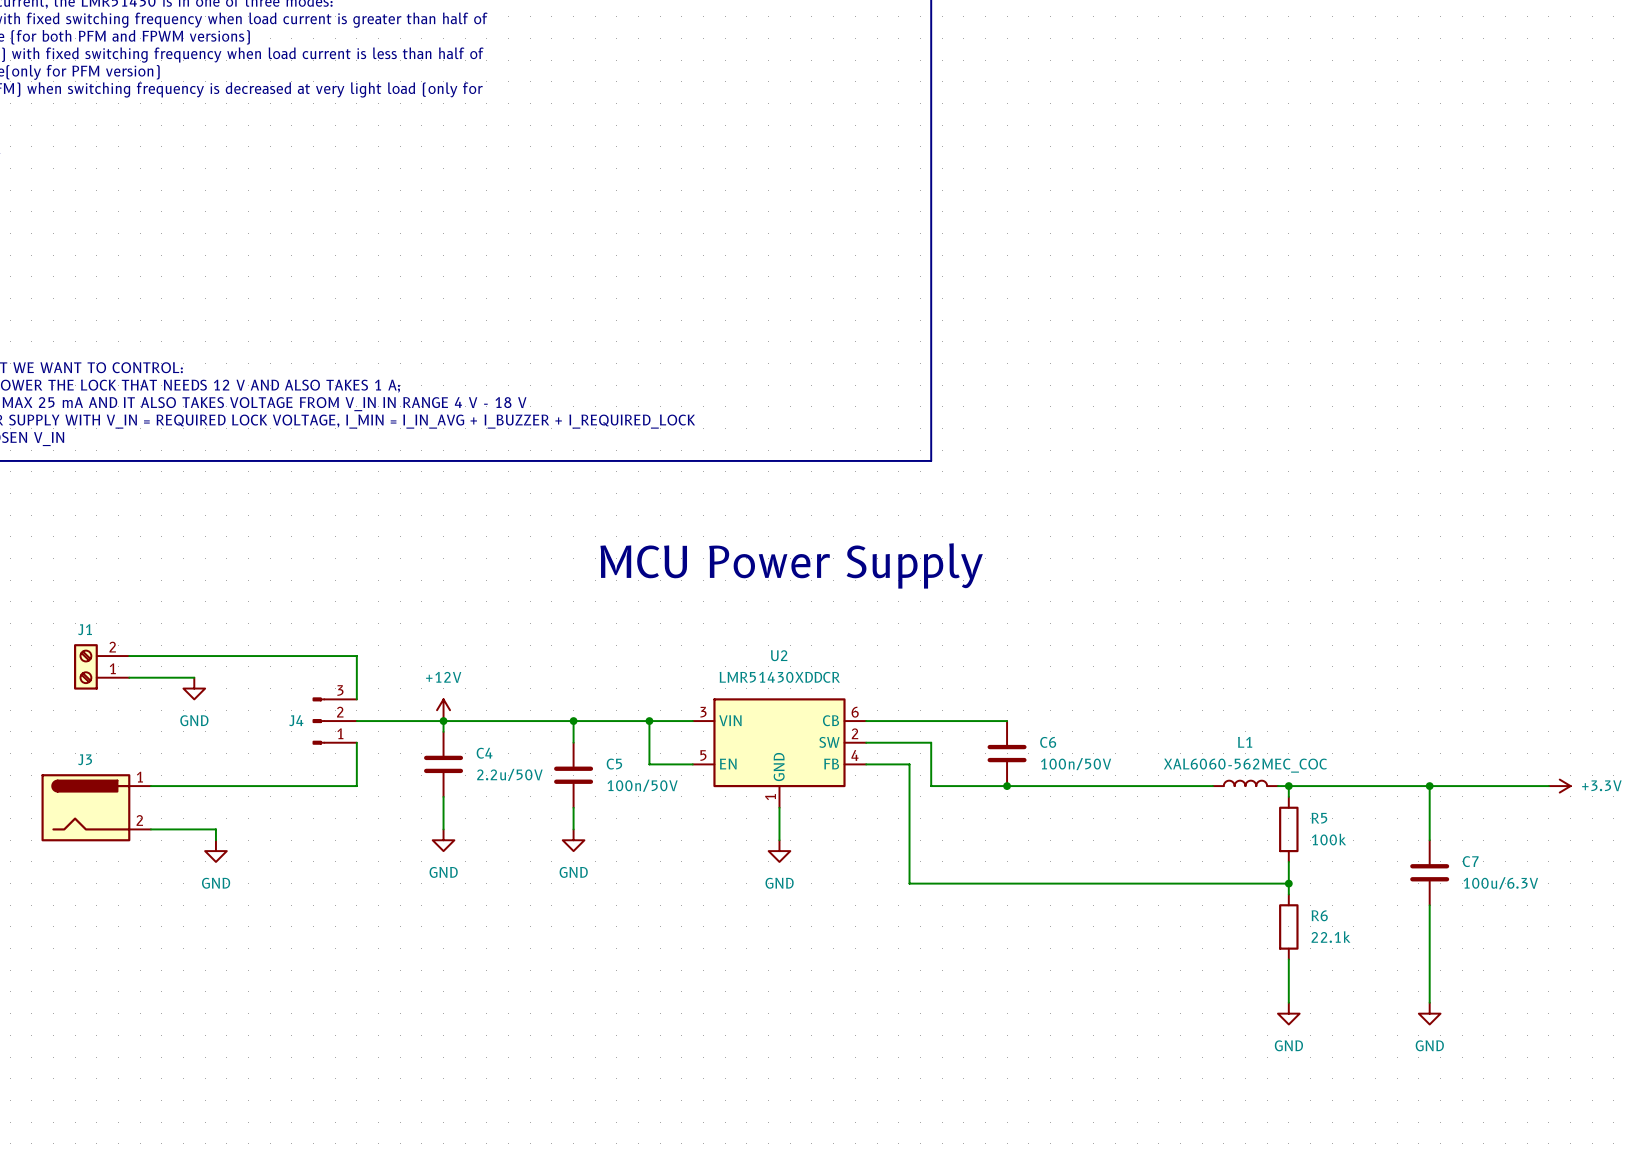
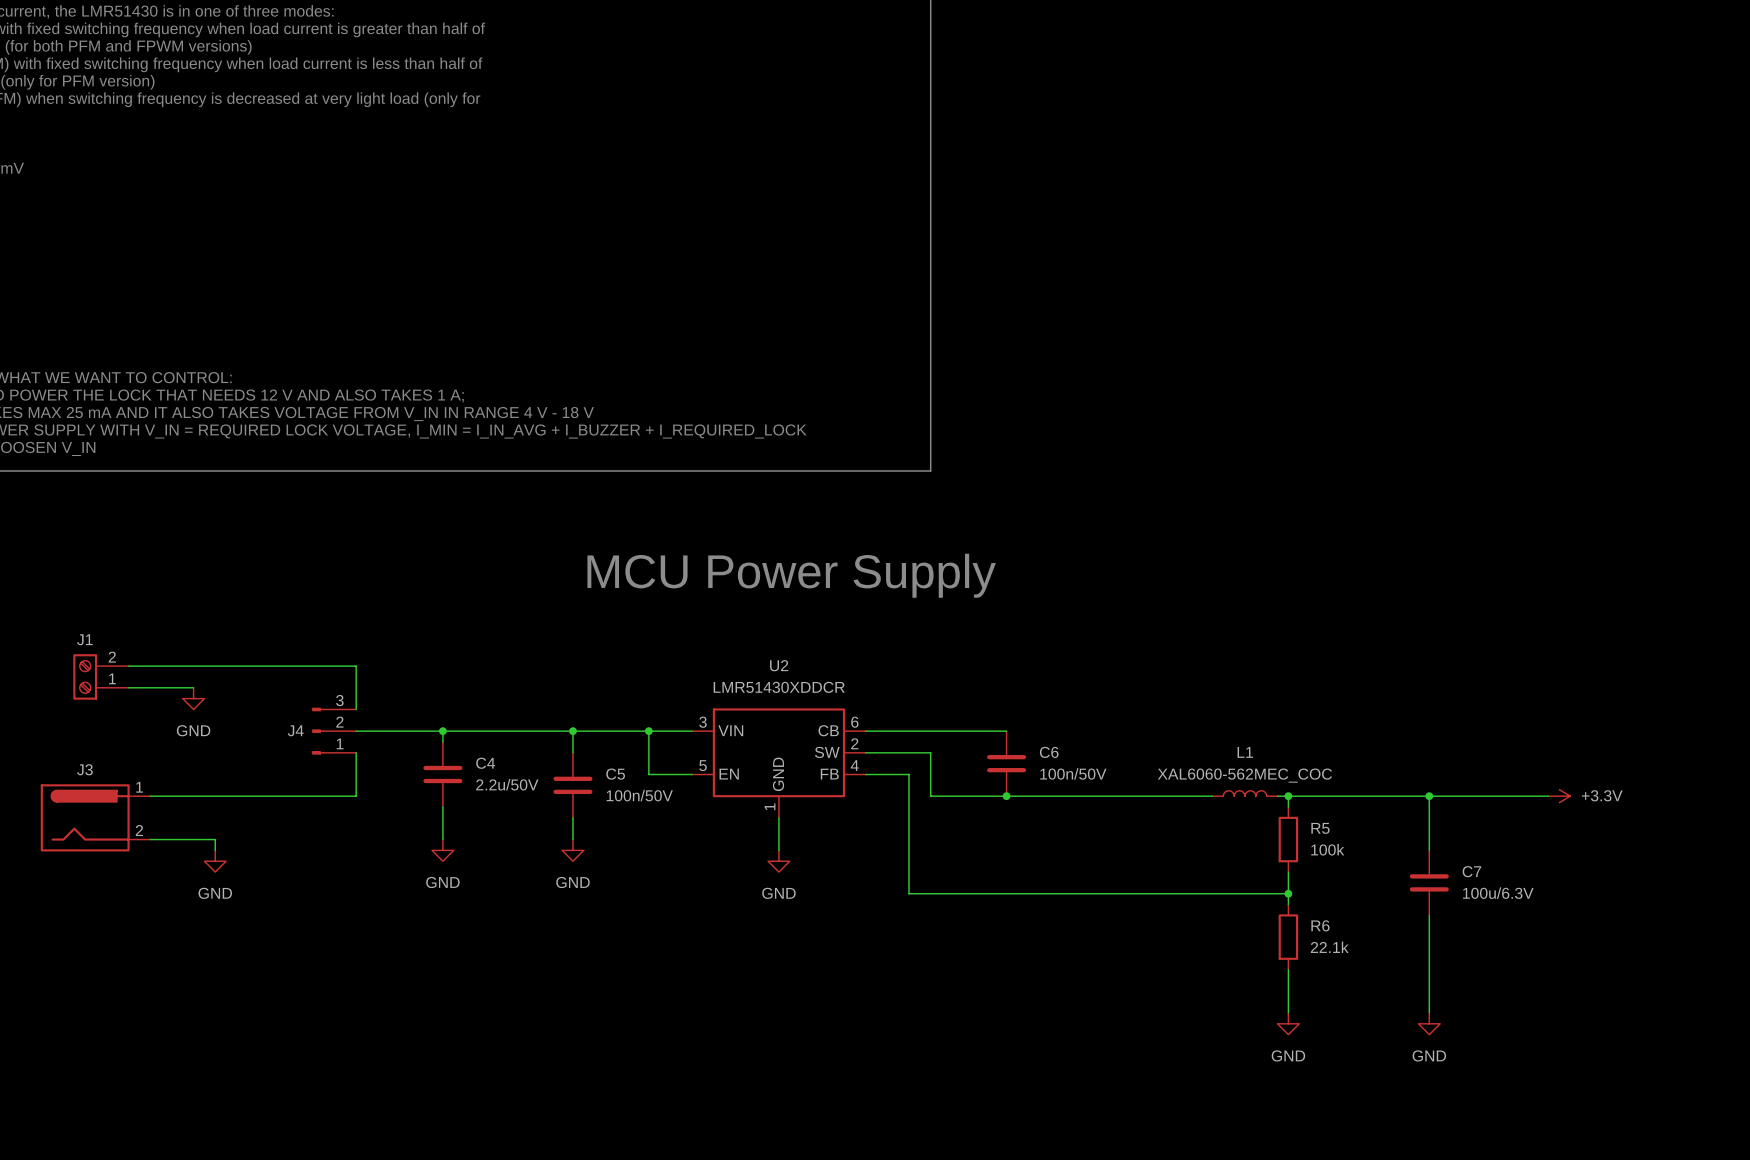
power symbol: +12V (443, 710) -> none

